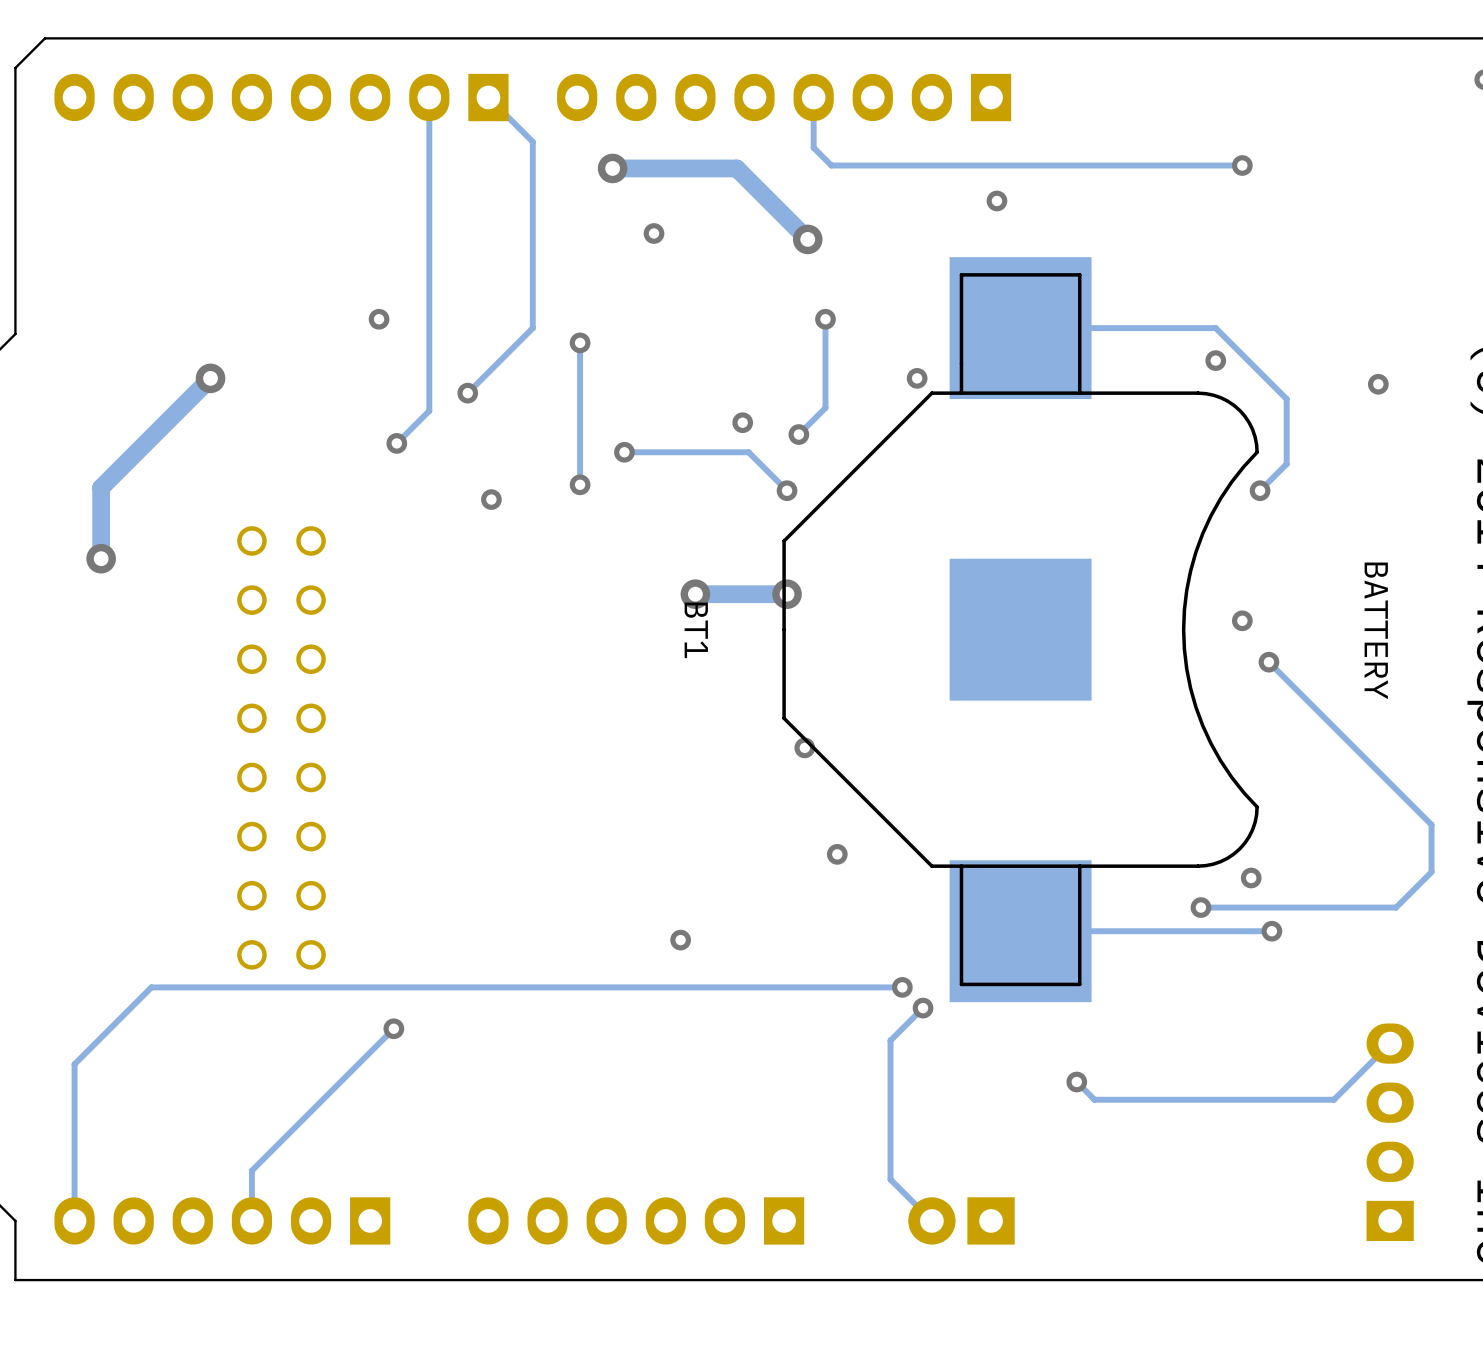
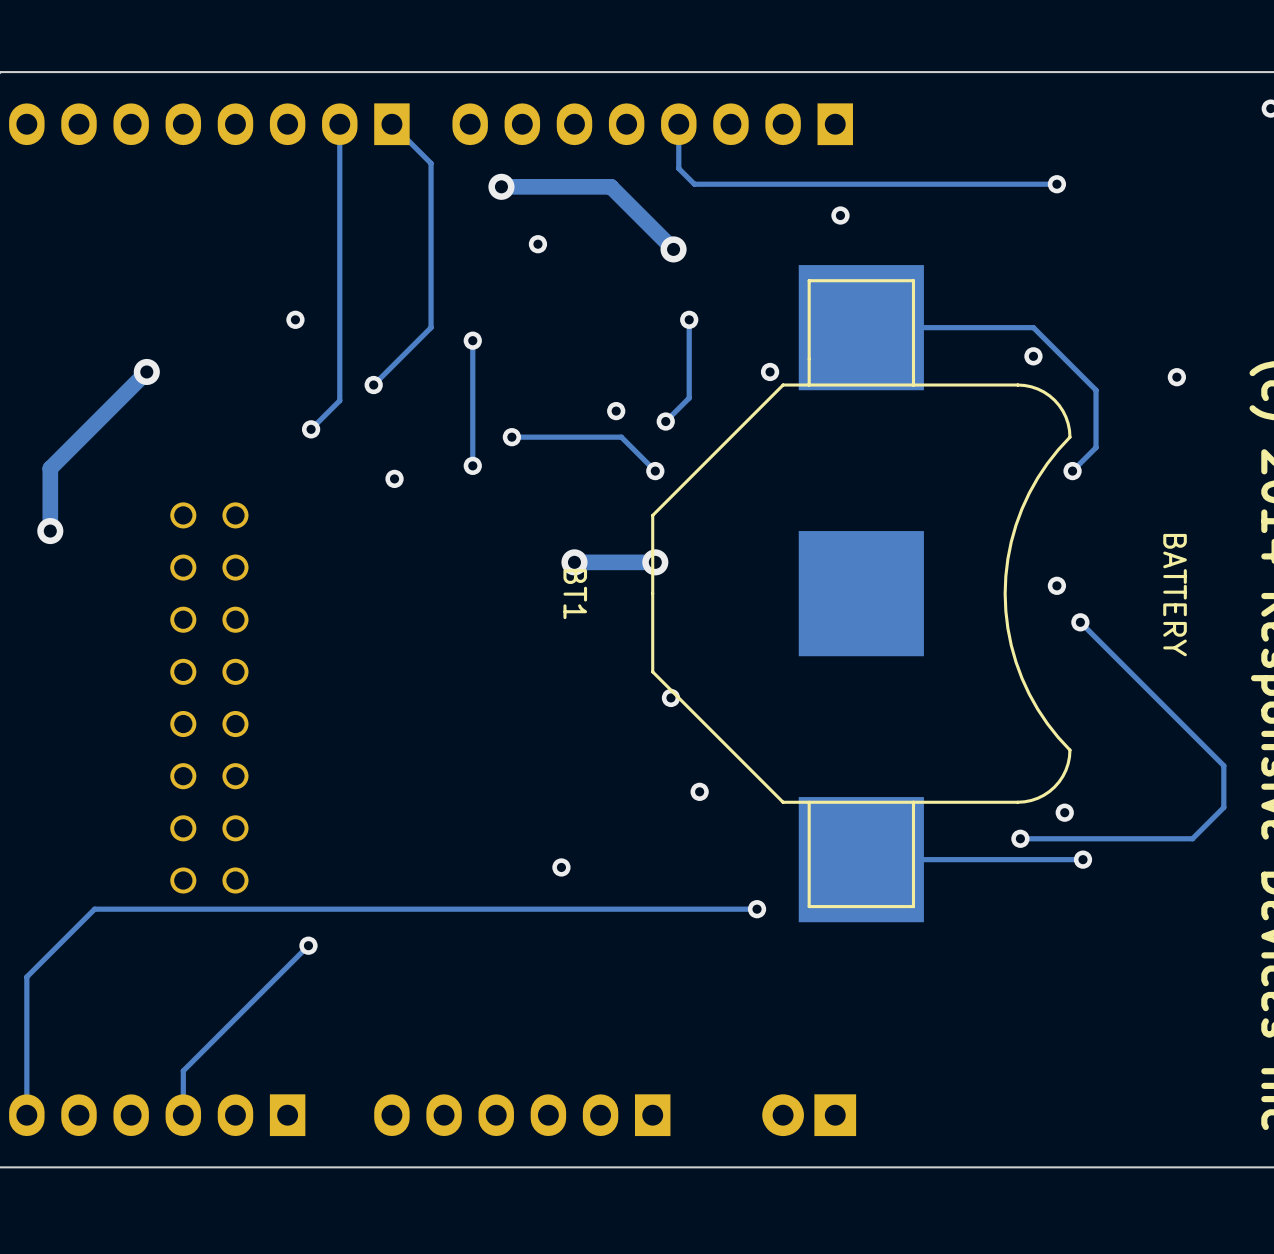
track: (923, 1008) (890, 1040) (890, 1179) (931, 1220) -> none
via: (923, 1008) -> none
track: (1390, 1043) (1333, 1099) (1094, 1099) (1076, 1081) -> none
via: (1076, 1081) -> none
part: (1390, 1132) -> none

